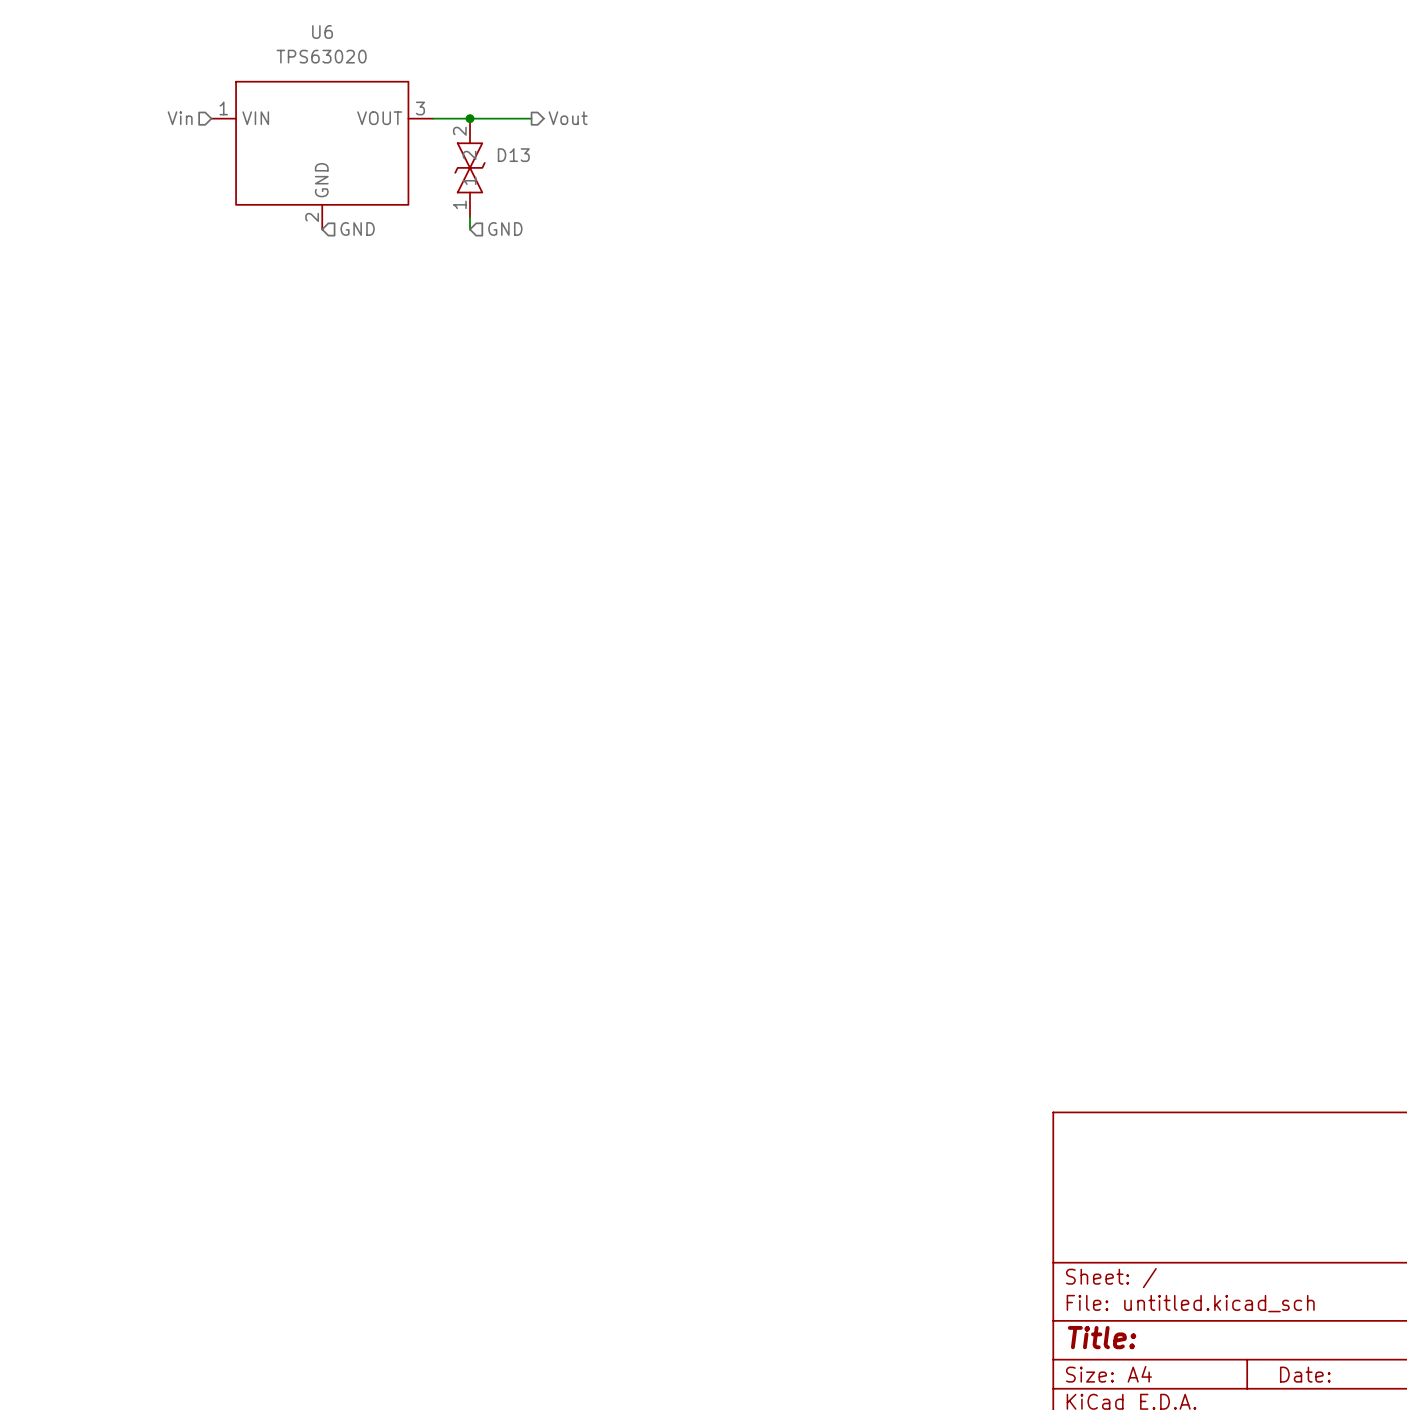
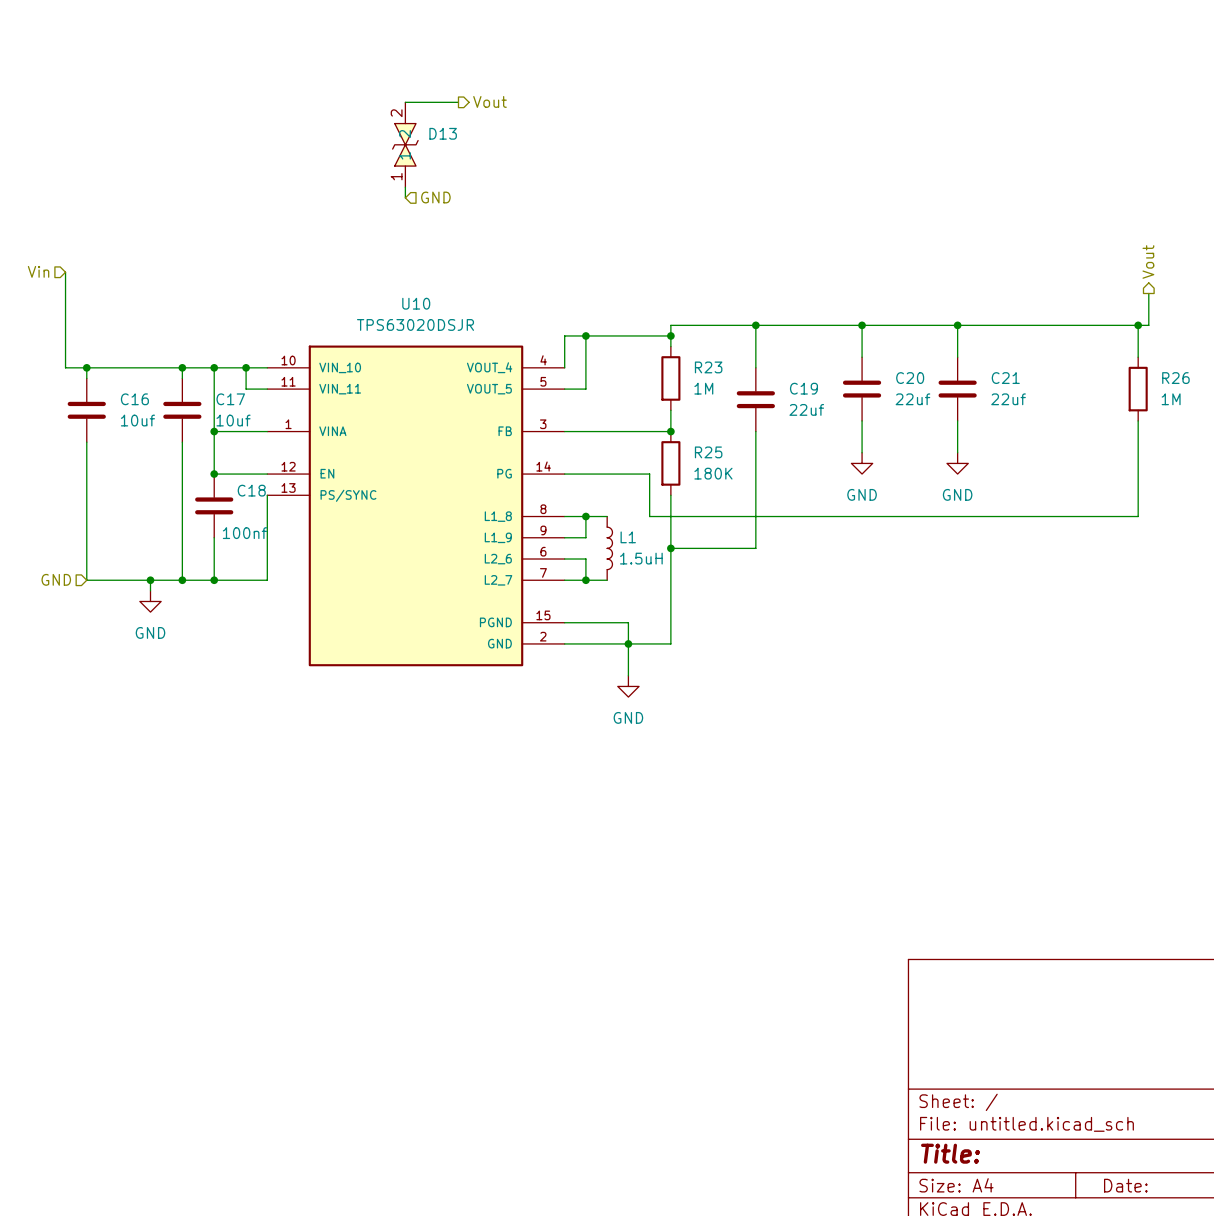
hierarchical label position: Vin (180, 118) -> Vin (38, 271)
wire: (433, 118) (470, 118) -> none
junction: (470, 118) -> none
U6: TPS63020 (322, 155) -> none
hierarchical label: GND (357, 229) -> none
hierarchical label: none -> Vout (1148, 261)
wire: none -> (65, 272) (65, 367) (267, 367)
wire: none -> (1148, 293) (1148, 325) (670, 325) (670, 346)
wire: none -> (755, 325) (755, 367)
junction: none -> (755, 325)
wire: none -> (862, 325) (862, 357)
junction: none -> (862, 325)
wire: none -> (957, 325) (957, 357)
junction: none -> (957, 325)
wire: none -> (1138, 325) (1138, 357)
junction: none -> (1138, 325)
wire: none -> (585, 335) (585, 389) (564, 389)
junction: none -> (585, 335)
wire: none -> (670, 335) (564, 335) (564, 367)
junction: none -> (670, 335)
wire: none -> (86, 367) (86, 378)
junction: none -> (86, 367)
wire: none -> (182, 367) (182, 378)
junction: none -> (182, 367)
wire: none -> (214, 367) (214, 474) (267, 474)
junction: none -> (214, 367)
wire: none -> (246, 367) (246, 389) (267, 389)
junction: none -> (246, 367)
R23: none -> 1M (670, 378)
C20: none -> 22uf (862, 389)
C21: none -> 22uf (957, 389)
R26: none -> 1M (1138, 389)
C19: none -> 22uf (755, 399)
C16: none -> 10uf (86, 410)
C17: none -> 10uf (182, 410)
wire: none -> (670, 410) (670, 431) (564, 431)
wire: none -> (862, 420) (862, 452)
wire: none -> (957, 420) (957, 452)
wire: none -> (1138, 420) (1138, 516) (649, 516) (649, 474) (564, 474)
wire: none -> (214, 431) (267, 431)
junction: none -> (214, 431)
junction: none -> (670, 431)
wire: none -> (755, 431) (755, 548) (670, 548)
wire: none -> (86, 442) (86, 580) (267, 580) (267, 495)
wire: none -> (182, 442) (182, 580)
R25: none -> 180K (670, 463)
power symbol: none -> GND (862, 463)
power symbol: none -> GND (957, 463)
junction: none -> (214, 474)
wire: none -> (670, 495) (670, 643) (564, 643)
C18: none -> 100nf (214, 505)
U10: none -> TPS63020DSJR (416, 505)
wire: none -> (564, 516) (607, 516)
wire: none -> (585, 516) (585, 537) (564, 537)
junction: none -> (585, 516)
wire: none -> (214, 537) (214, 580)
L1: none -> 1.5uH (609, 548)
junction: none -> (670, 548)
wire: none -> (564, 559) (585, 559) (585, 580)
hierarchical label: none -> GND (56, 579)
wire: none -> (150, 580) (150, 590)
junction: none -> (150, 580)
junction: none -> (182, 580)
junction: none -> (214, 580)
wire: none -> (564, 580) (607, 580)
junction: none -> (585, 580)
power symbol: none -> GND (150, 601)
wire: none -> (564, 622) (628, 622) (628, 675)
junction: none -> (628, 643)
power symbol: none -> GND (628, 686)

